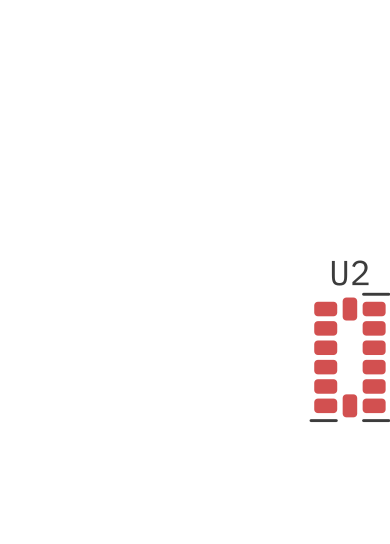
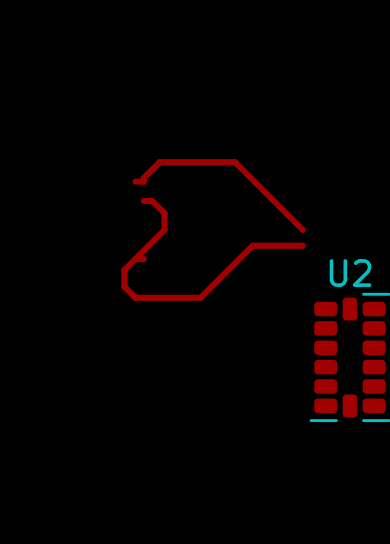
track: none -> (135, 181) (143, 181) (143, 178) (159, 162) (235, 162) (302, 230)
track: none -> (143, 200) (152, 200) (164, 213) (164, 230) (124, 270) (124, 286) (135, 297) (200, 297) (252, 245) (302, 245)
track: none -> (135, 259) (143, 259)

